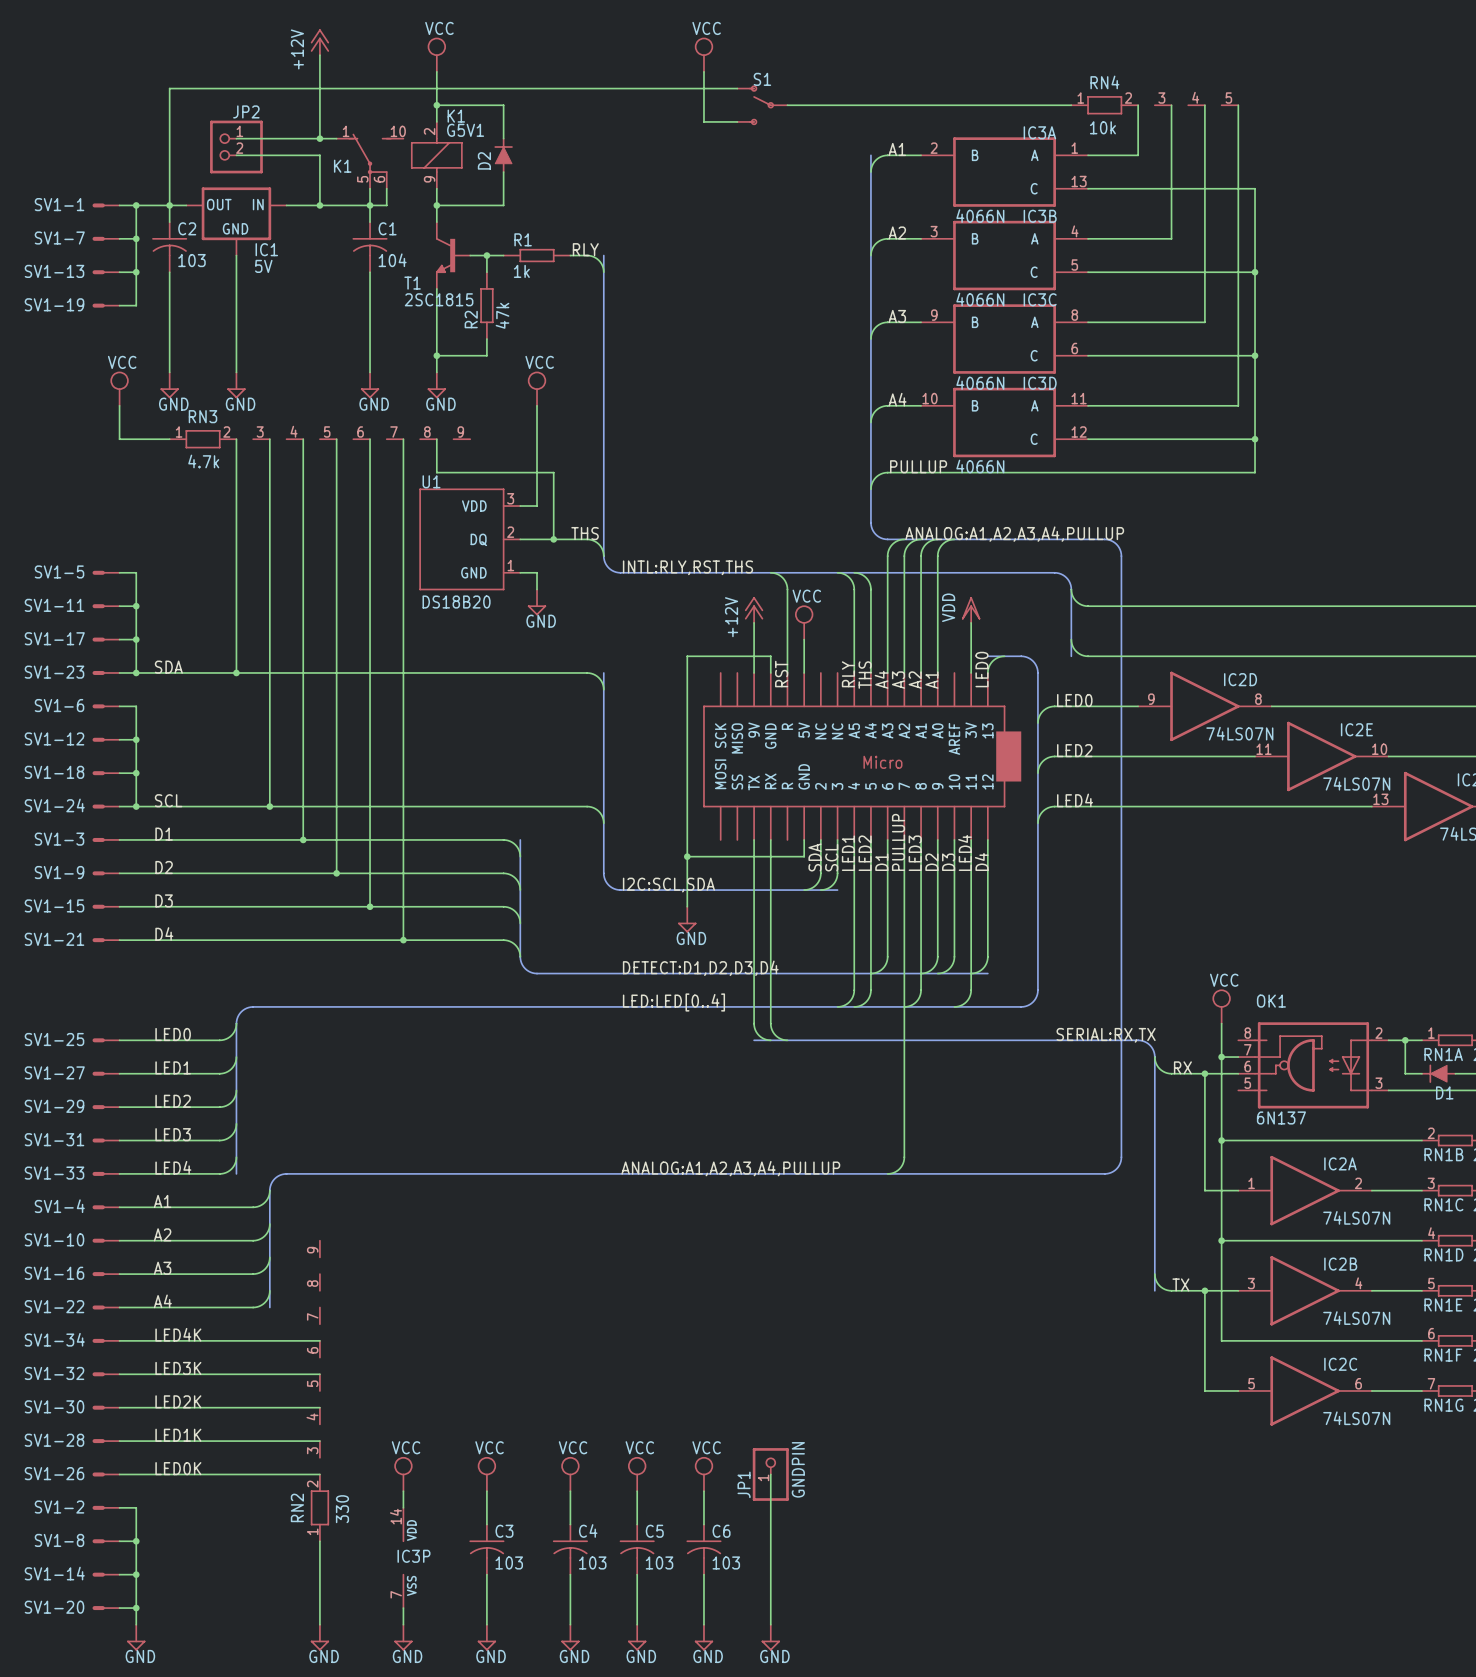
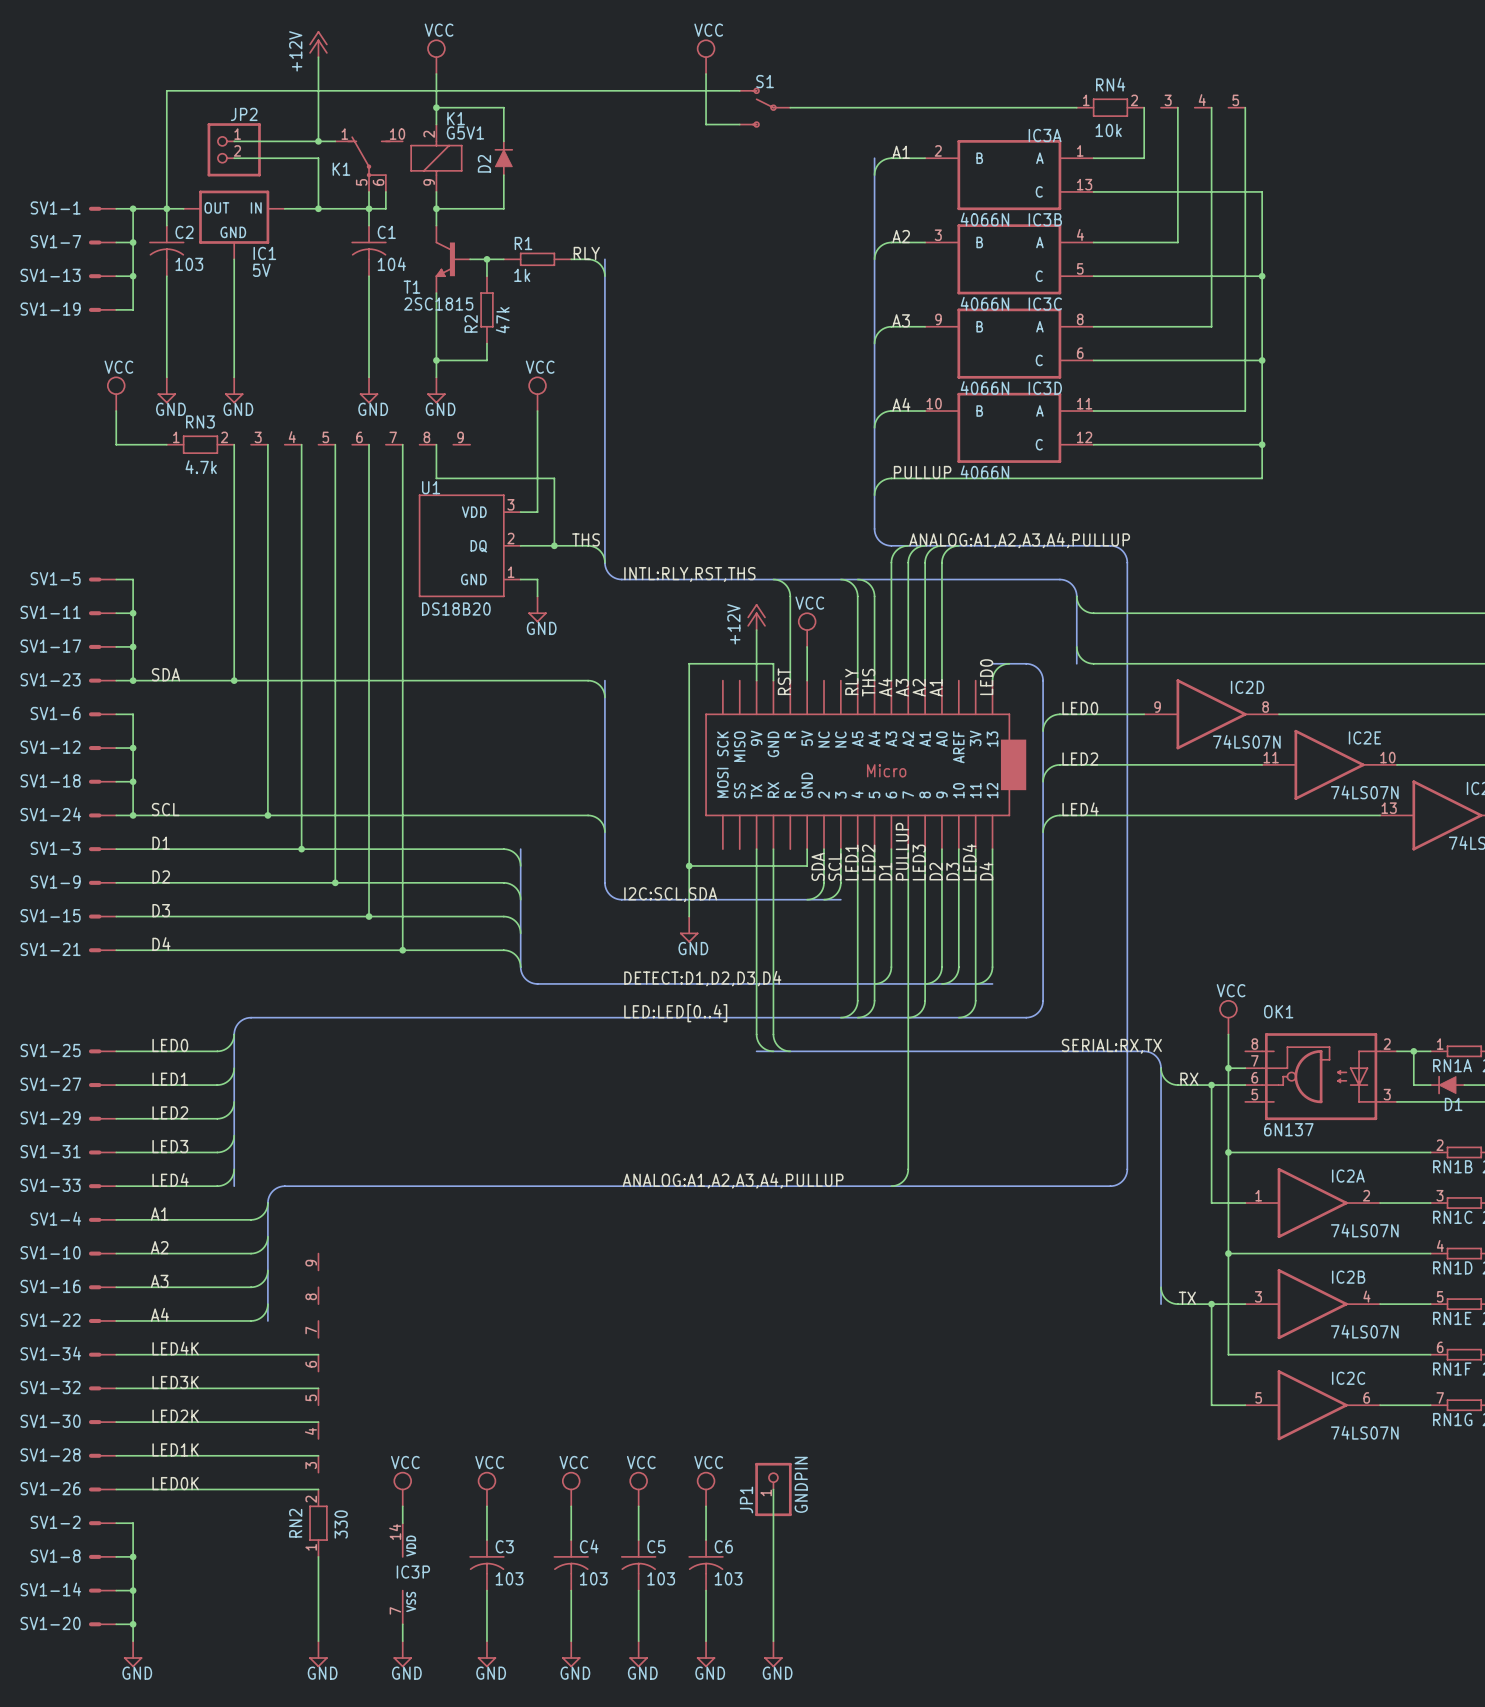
power symbol: VDD (971, 609) -> none
wire: (971, 622) (971, 672) -> none

